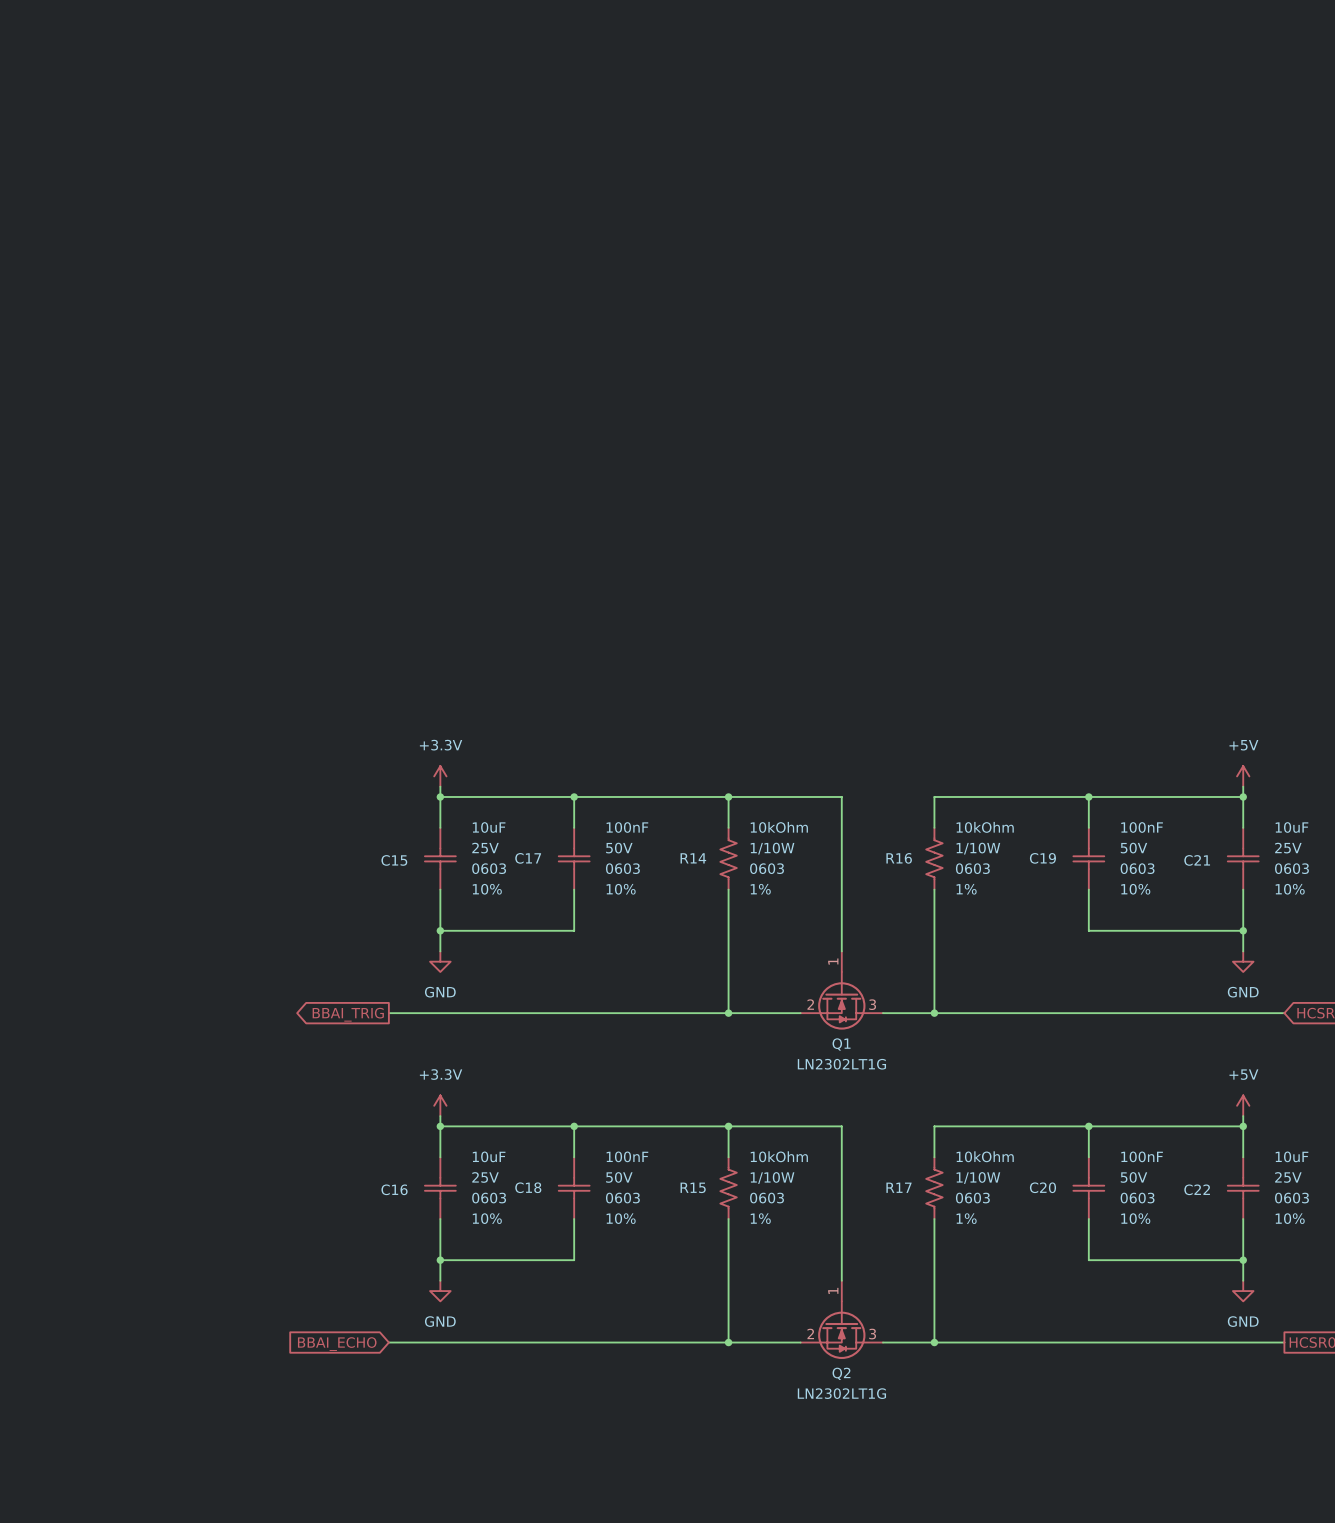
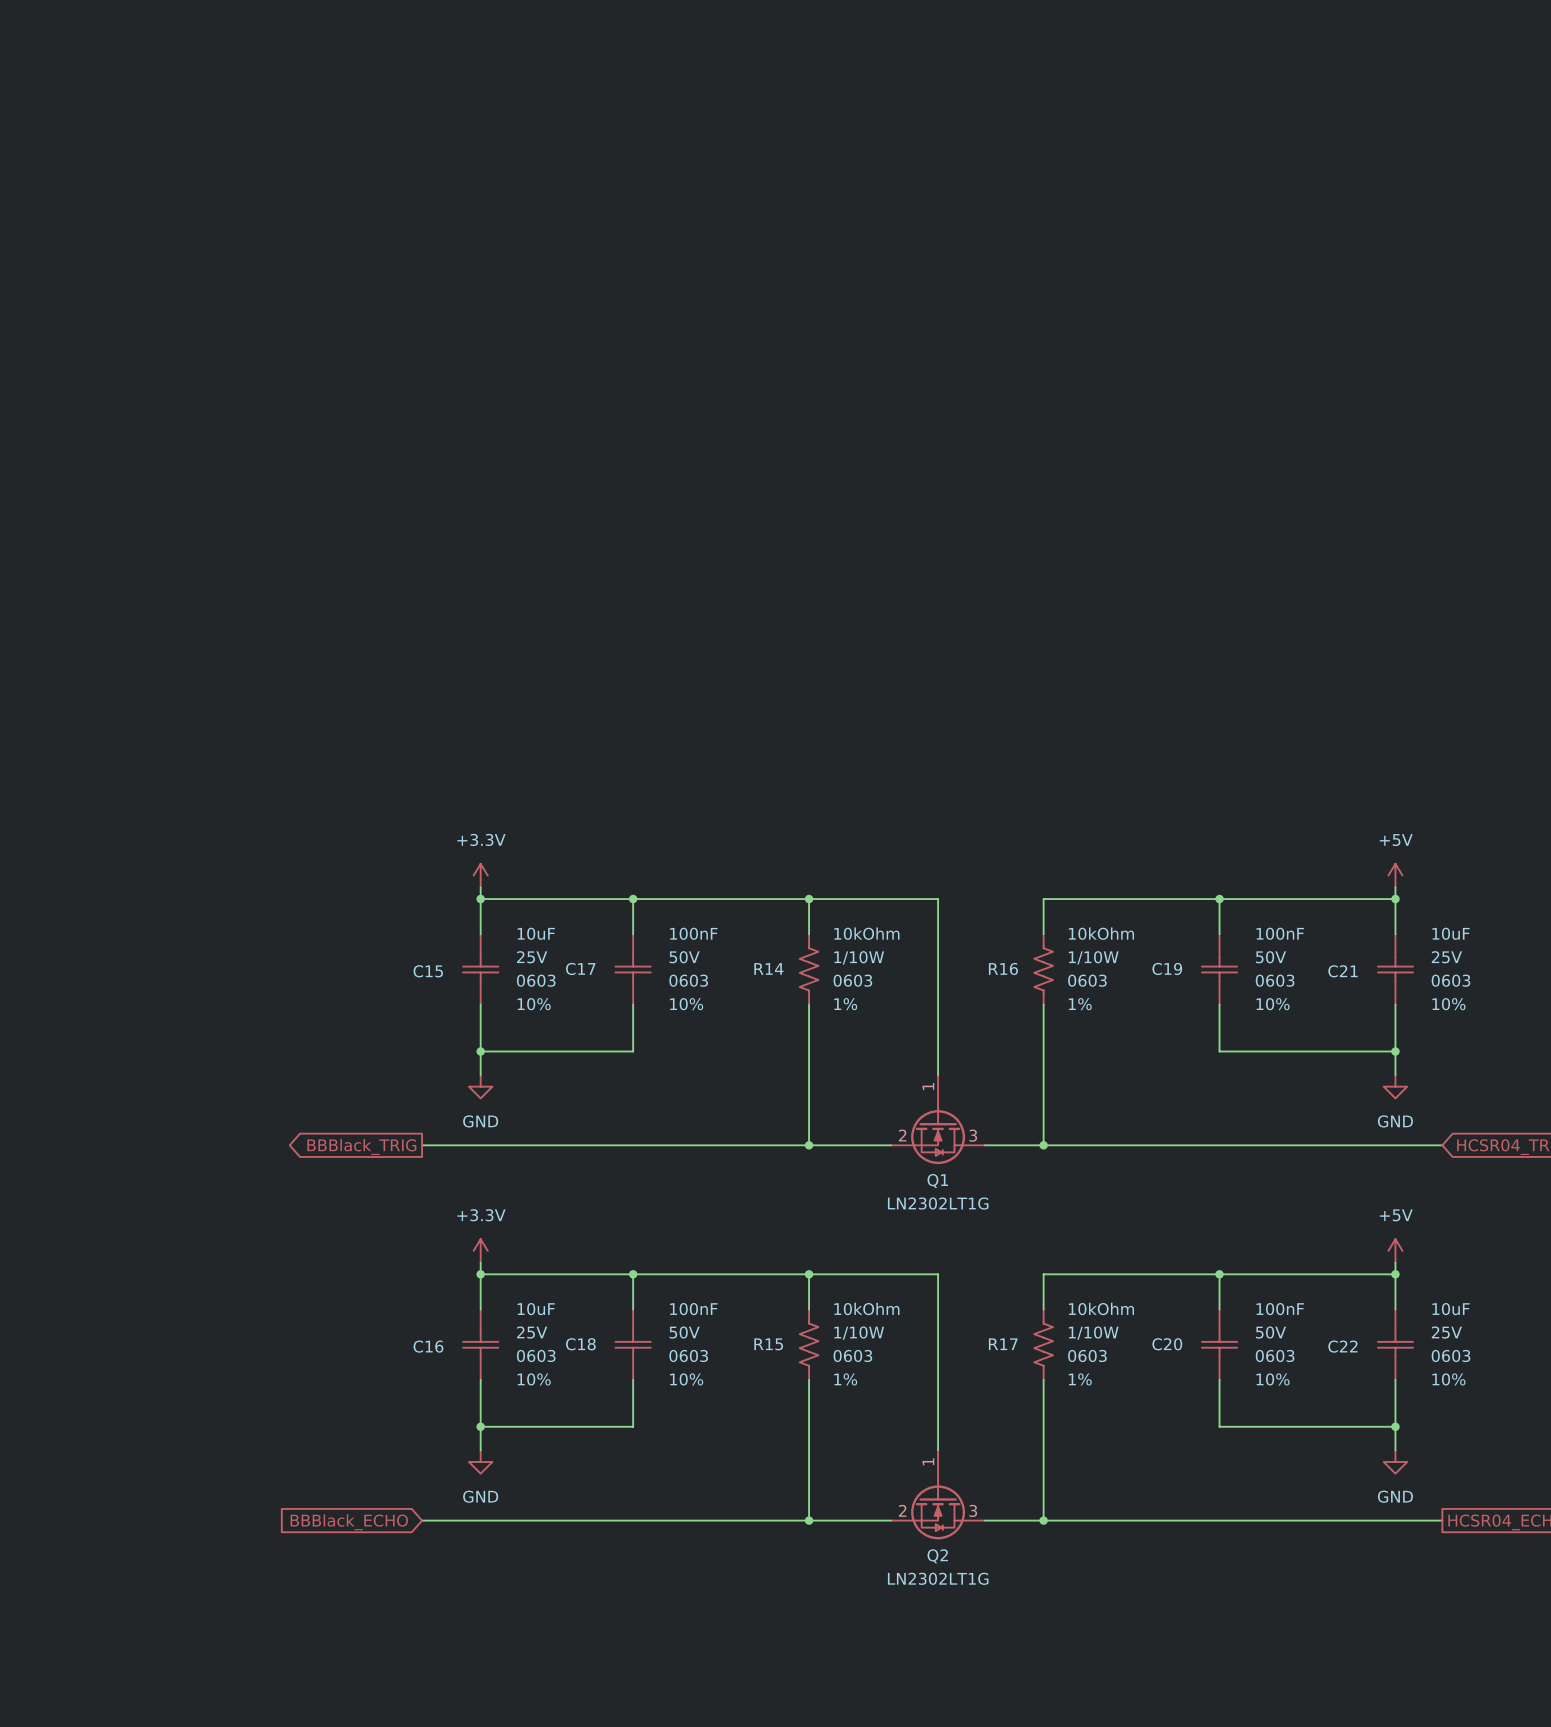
global label: BBAI_TRIG (348, 1014) -> BBBlack_TRIG (361, 1146)
global label: BBAI_ECHO (337, 1344) -> BBBlack_ECHO (349, 1522)

